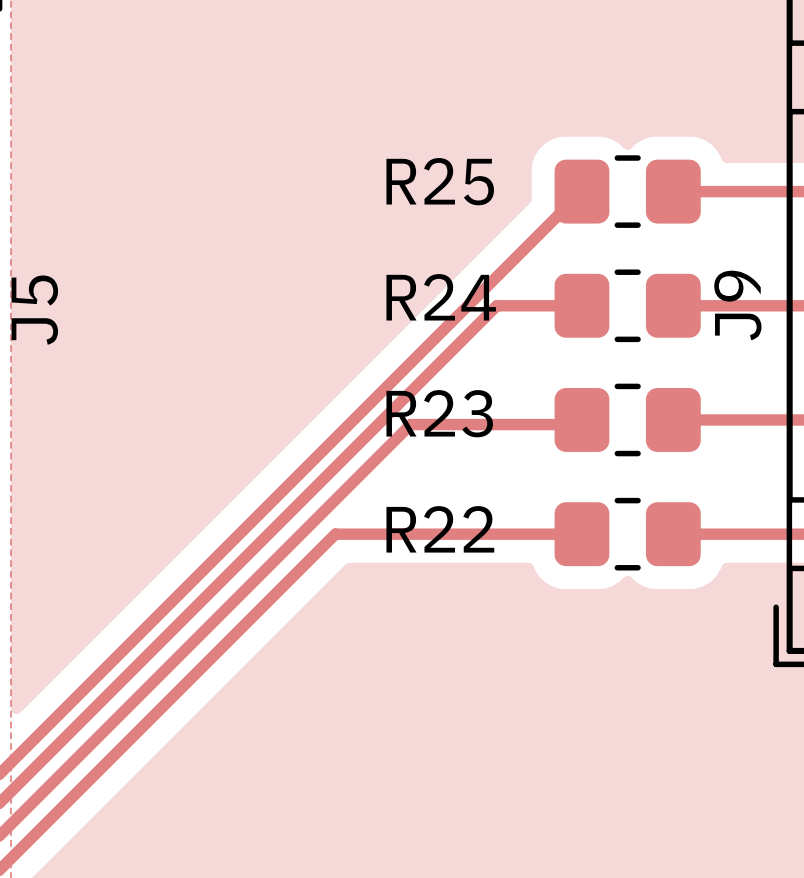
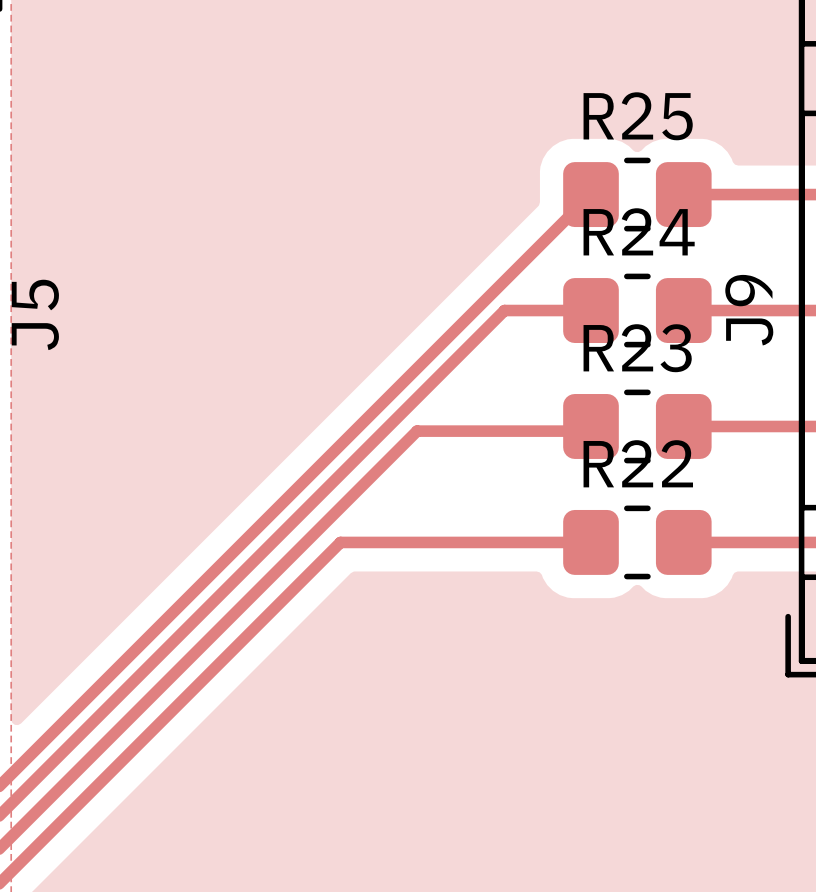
R25 name position: R25 (440, 181) -> R25 (638, 116)
R24 name position: R24 (441, 297) -> R24 (639, 231)
R23 name position: R23 (439, 413) -> R23 (637, 348)
R22 name position: R22 (440, 529) -> R22 (638, 463)

